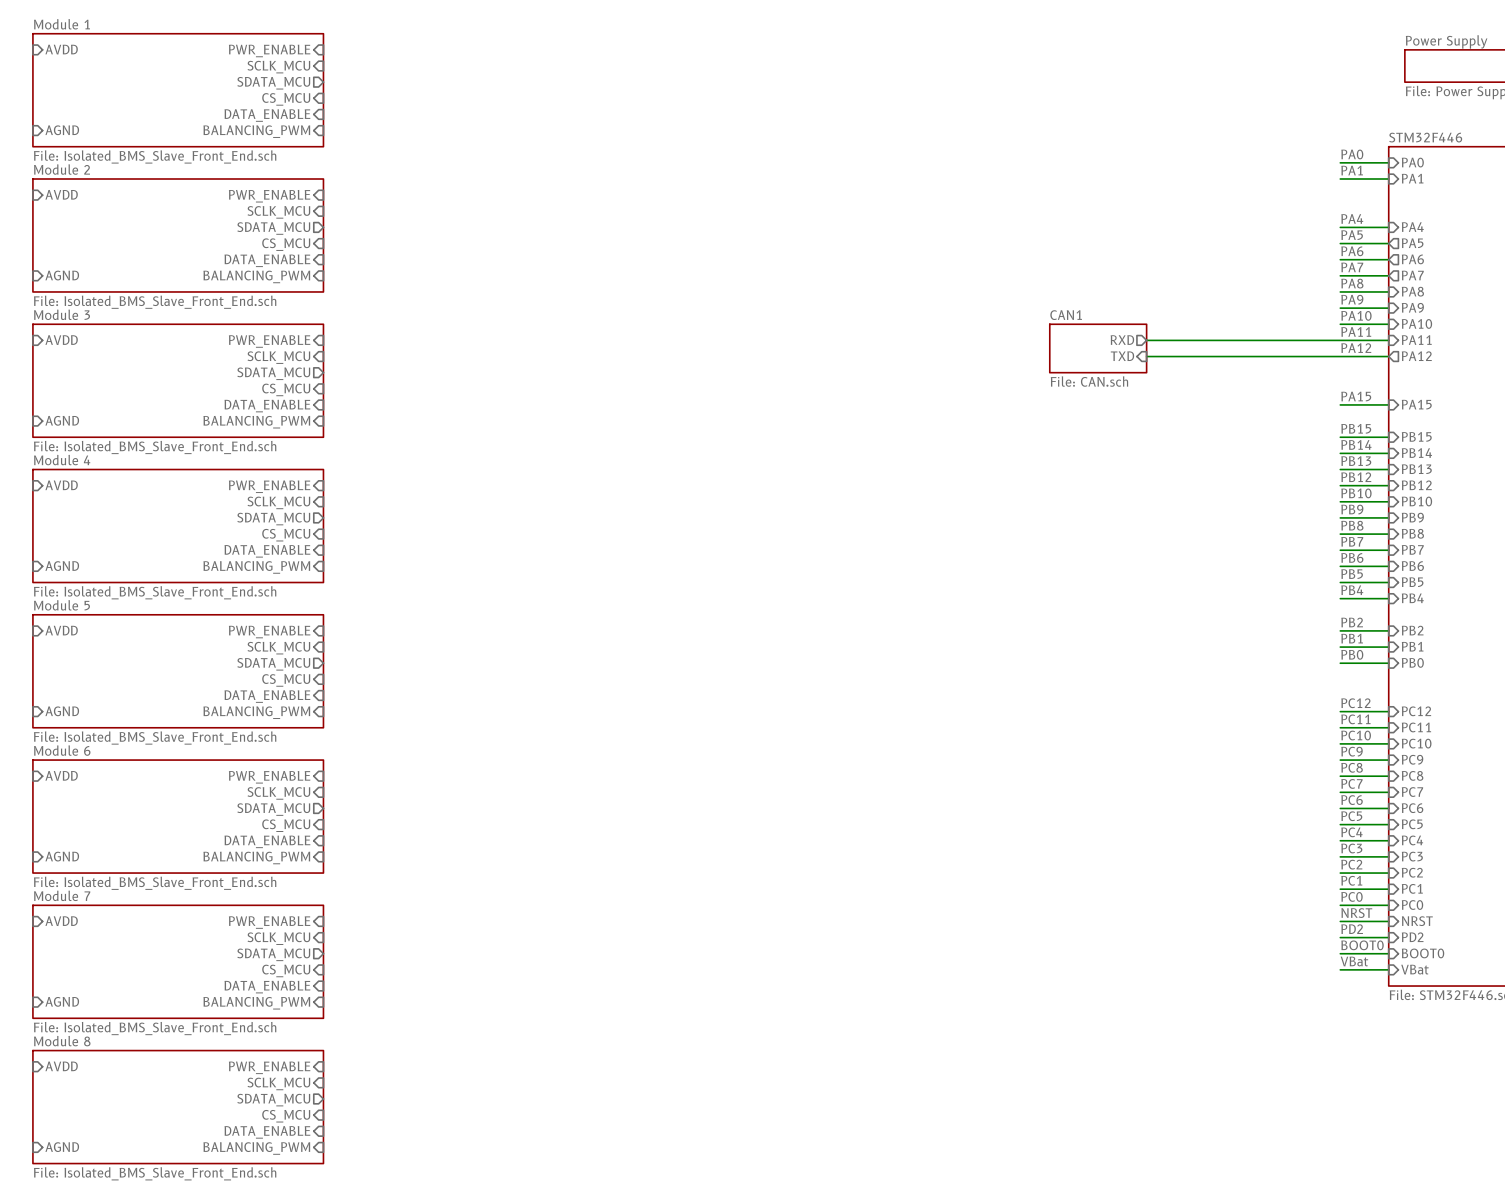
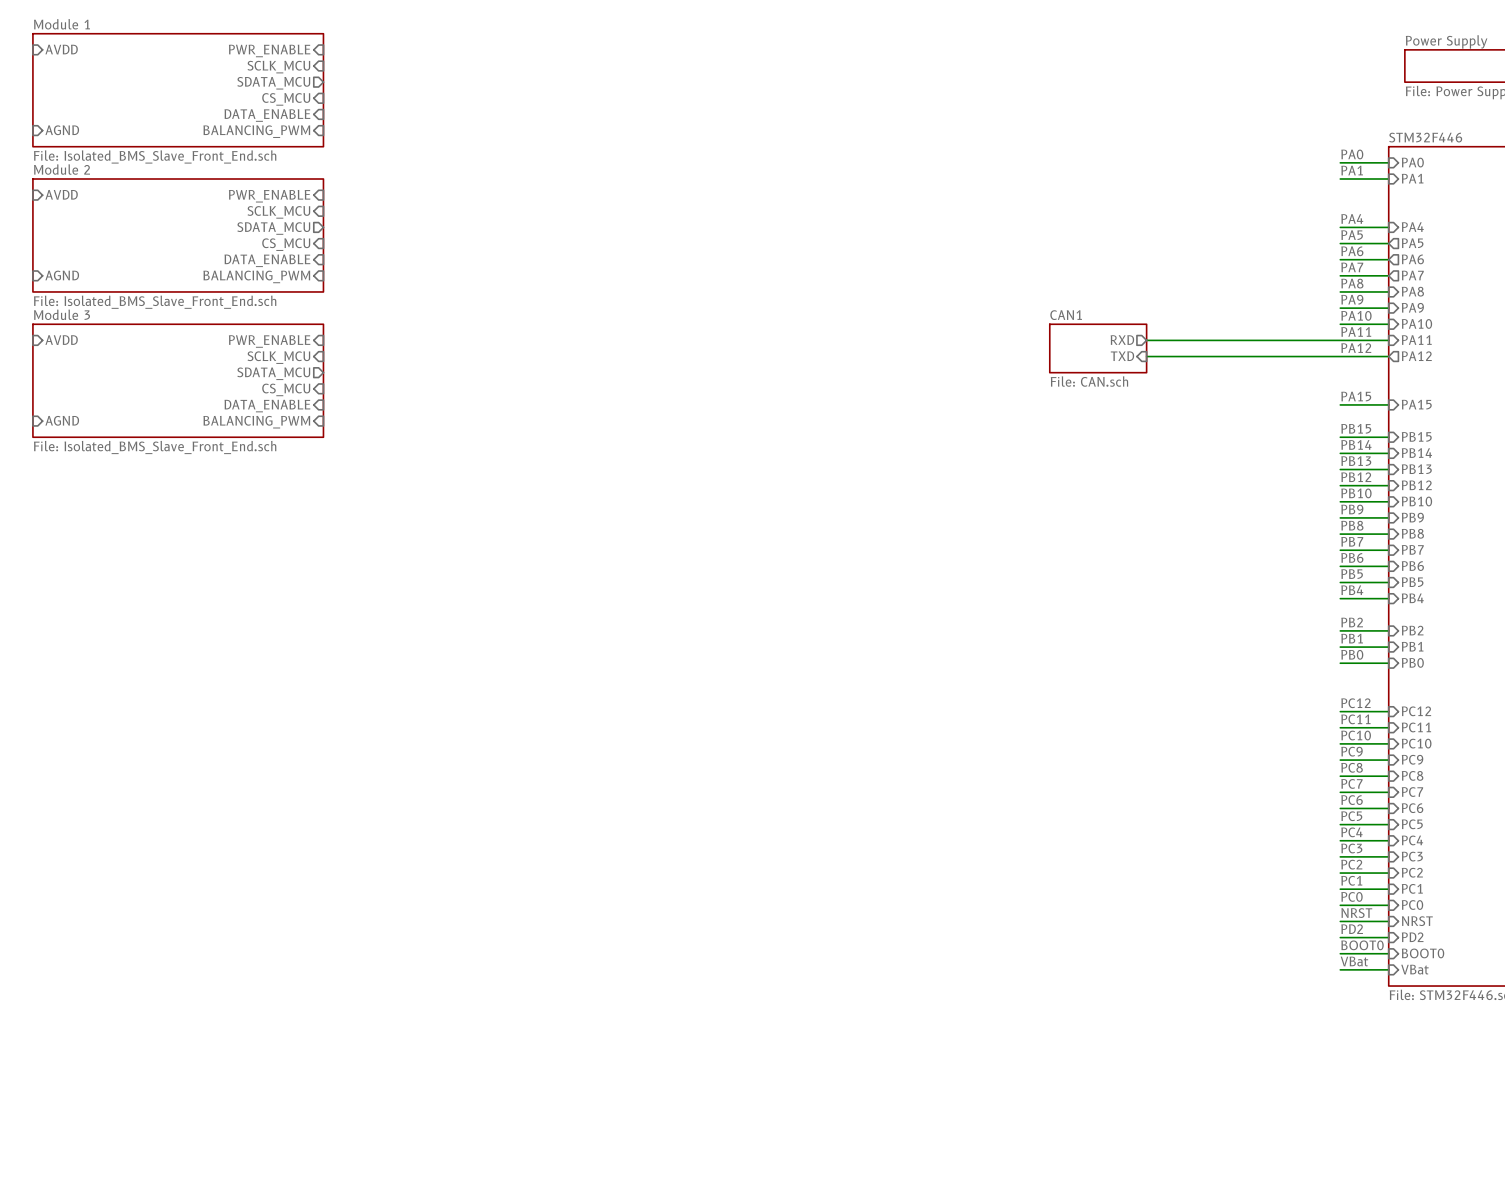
sheet pin: AVDD (61, 485) -> none
sheet pin: PWR_ENABLE (269, 486) -> none
sheet pin: SCLK_MCU (278, 502) -> none
sheet pin: SDATA_MCU (273, 519) -> none
sheet Module 4: File: Isolated_BMS_Slave_Front_End.sch (178, 526) -> none
sheet pin: CS_MCU (286, 535) -> none
sheet pin: DATA_ENABLE (267, 551) -> none
sheet pin: AGND (62, 566) -> none
sheet pin: BALANCING_PWM (256, 567) -> none
sheet pin: AVDD (61, 630) -> none
sheet pin: PWR_ENABLE (269, 632) -> none
sheet pin: SCLK_MCU (278, 648) -> none
sheet pin: SDATA_MCU (273, 664) -> none
sheet Module 5: File: Isolated_BMS_Slave_Front_End.sch (178, 671) -> none
sheet pin: CS_MCU (286, 680) -> none
sheet pin: DATA_ENABLE (267, 696) -> none
sheet pin: AGND (62, 711) -> none
sheet pin: BALANCING_PWM (256, 712) -> none
sheet pin: AVDD (61, 775) -> none
sheet pin: PWR_ENABLE (269, 777) -> none
sheet pin: SCLK_MCU (278, 793) -> none
sheet pin: SDATA_MCU (273, 809) -> none
sheet Module 6: File: Isolated_BMS_Slave_Front_End.sch (178, 816) -> none
sheet pin: CS_MCU (286, 825) -> none
sheet pin: DATA_ENABLE (267, 841) -> none
sheet pin: AGND (62, 856) -> none
sheet pin: BALANCING_PWM (256, 857) -> none
sheet pin: AVDD (61, 921) -> none
sheet pin: PWR_ENABLE (269, 922) -> none
sheet pin: SCLK_MCU (278, 938) -> none
sheet pin: SDATA_MCU (273, 954) -> none
sheet Module 7: File: Isolated_BMS_Slave_Front_End.sch (178, 961) -> none
sheet pin: CS_MCU (286, 970) -> none
sheet pin: DATA_ENABLE (267, 987) -> none
sheet pin: AGND (62, 1001) -> none
sheet pin: BALANCING_PWM (256, 1003) -> none
sheet pin: AVDD (61, 1066) -> none
sheet pin: PWR_ENABLE (269, 1067) -> none
sheet pin: SCLK_MCU (278, 1083) -> none
sheet pin: SDATA_MCU (273, 1100) -> none
sheet Module 8: File: Isolated_BMS_Slave_Front_End.sch (178, 1107) -> none
sheet pin: CS_MCU (286, 1116) -> none
sheet pin: DATA_ENABLE (267, 1132) -> none
sheet pin: AGND (62, 1147) -> none
sheet pin: BALANCING_PWM (256, 1148) -> none

